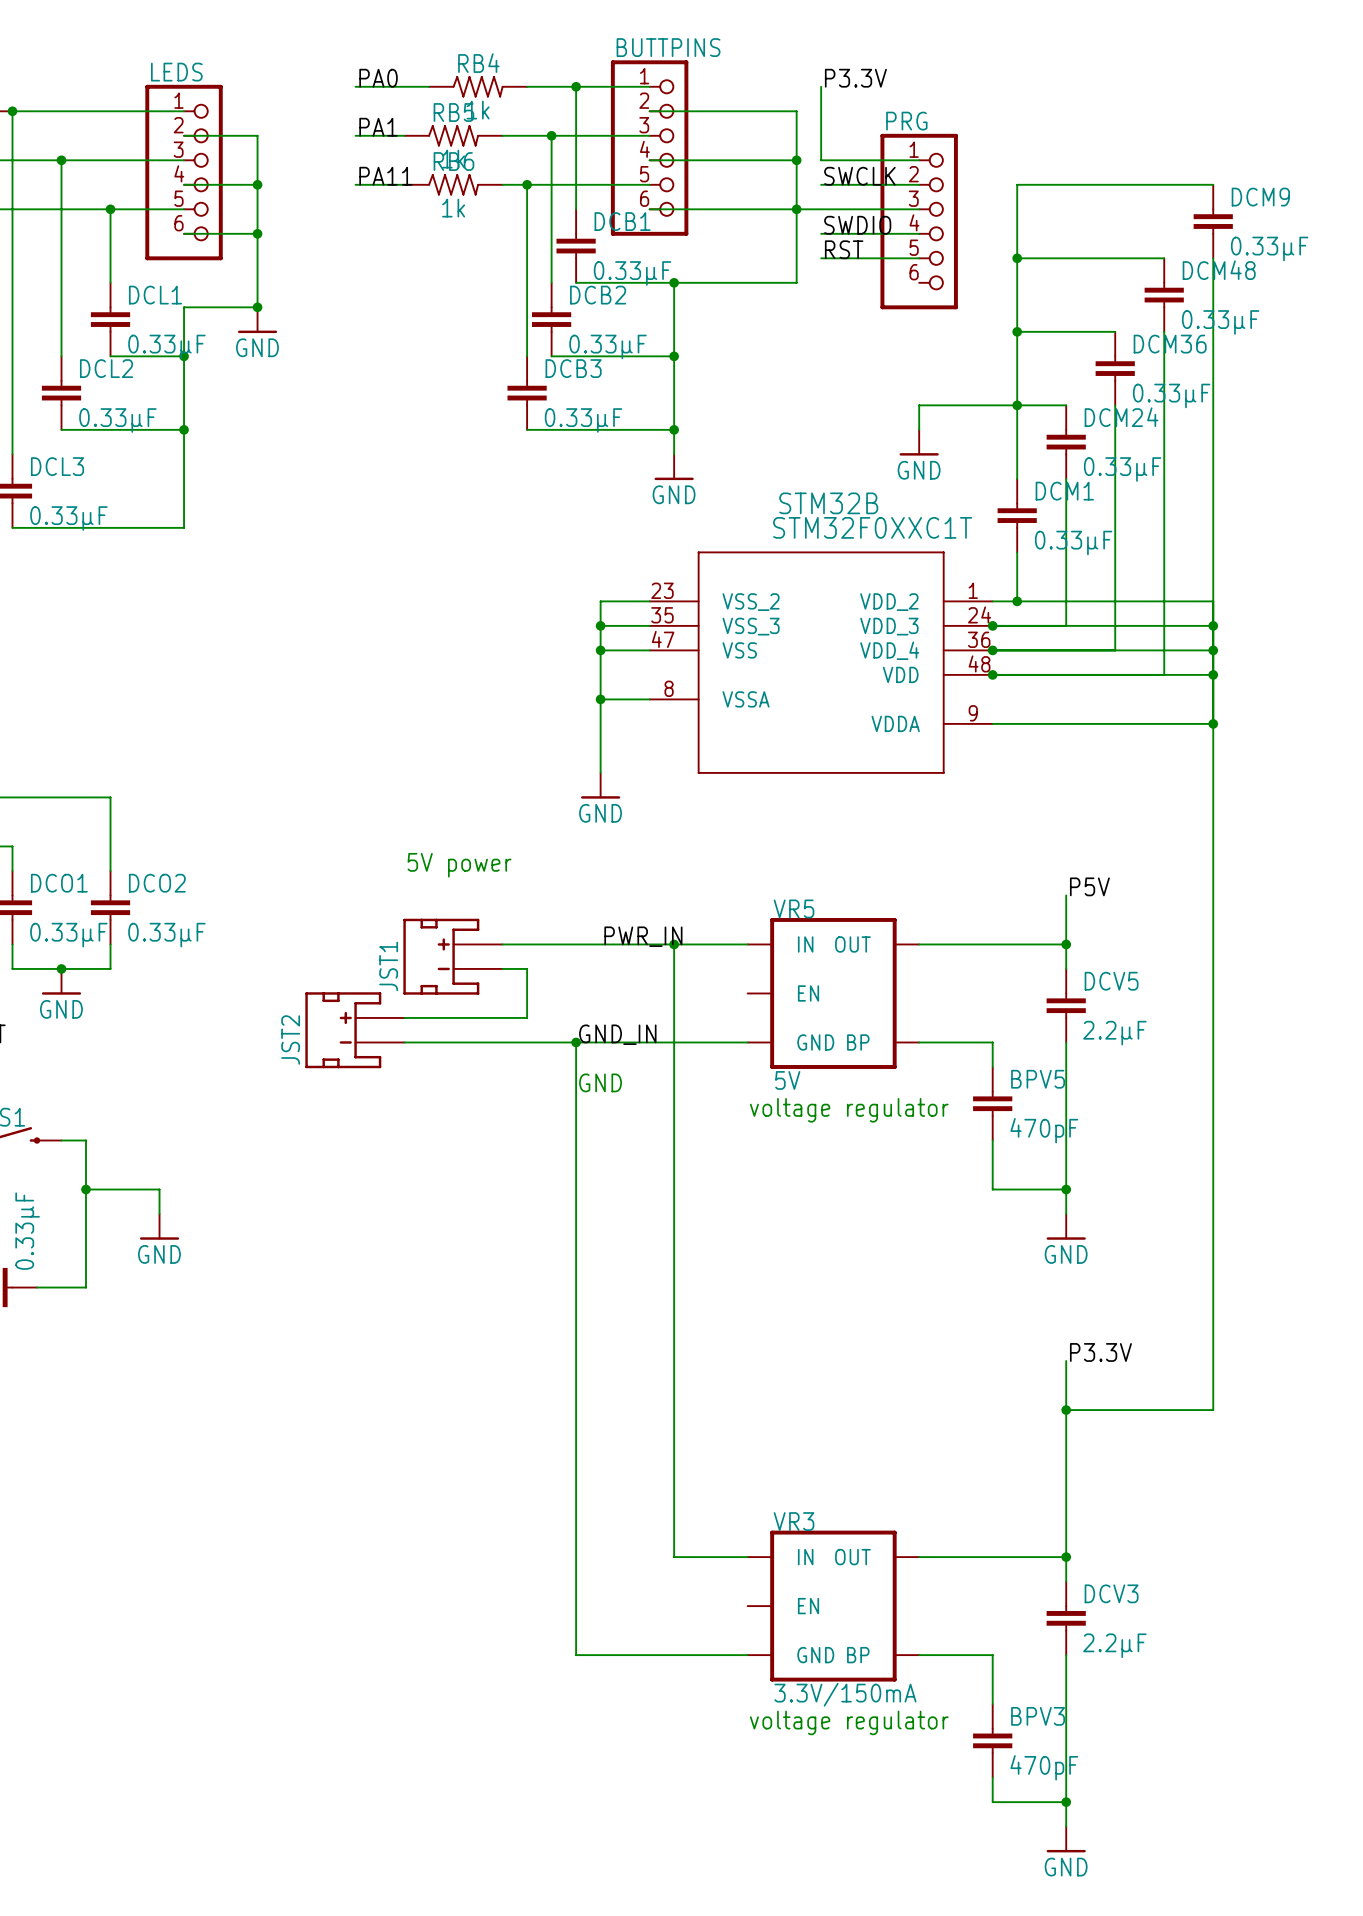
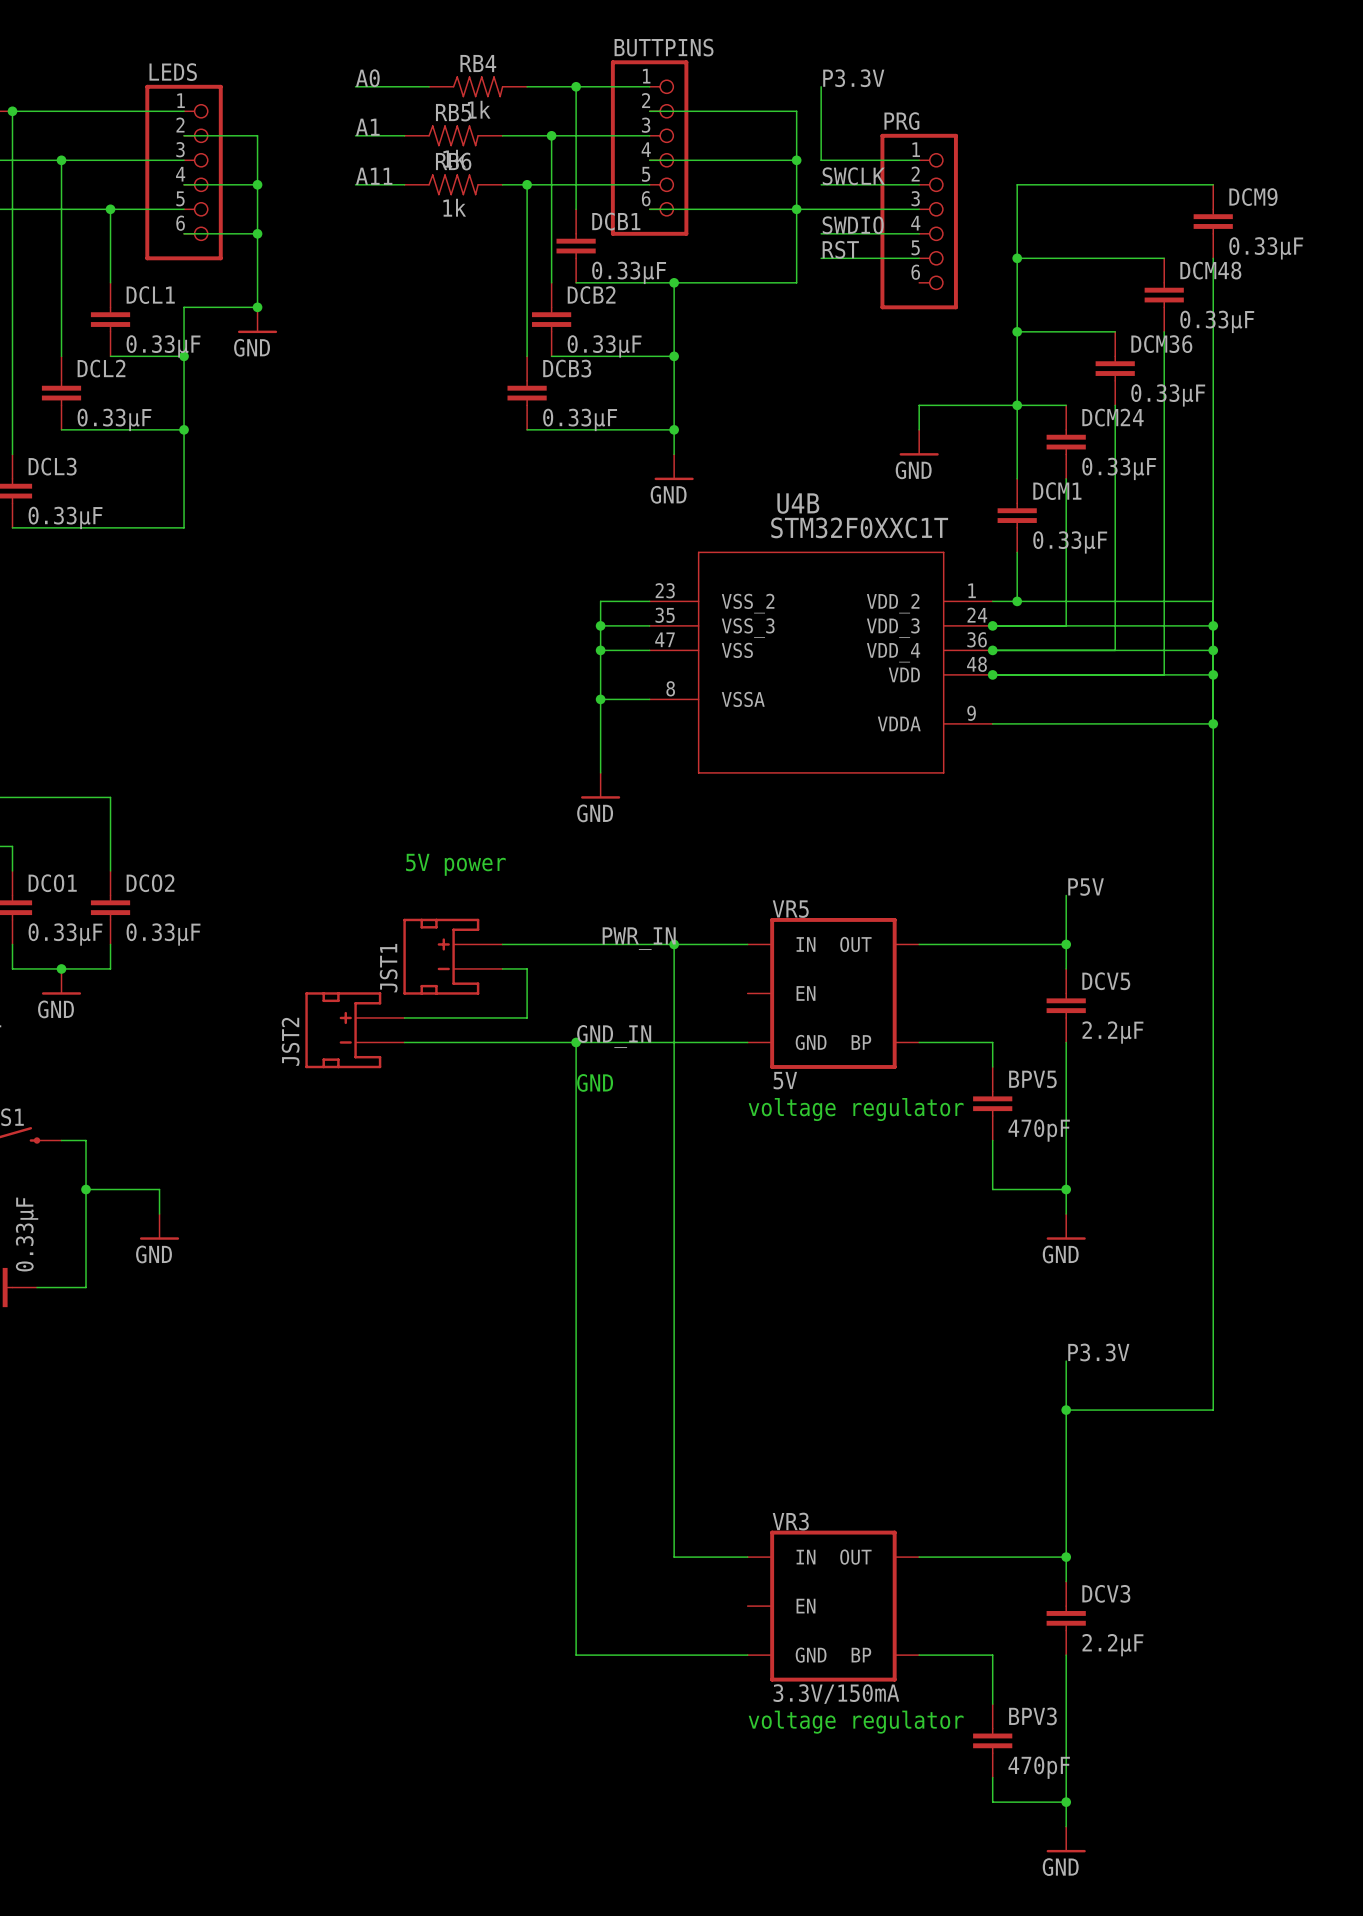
label: PA0 (378, 78) -> A0 (367, 78)
label: PA1 (378, 127) -> A1 (367, 127)
label: PA11 (385, 176) -> A11 (374, 176)
STM32B name: STM32B (828, 503) -> U4B (798, 503)

